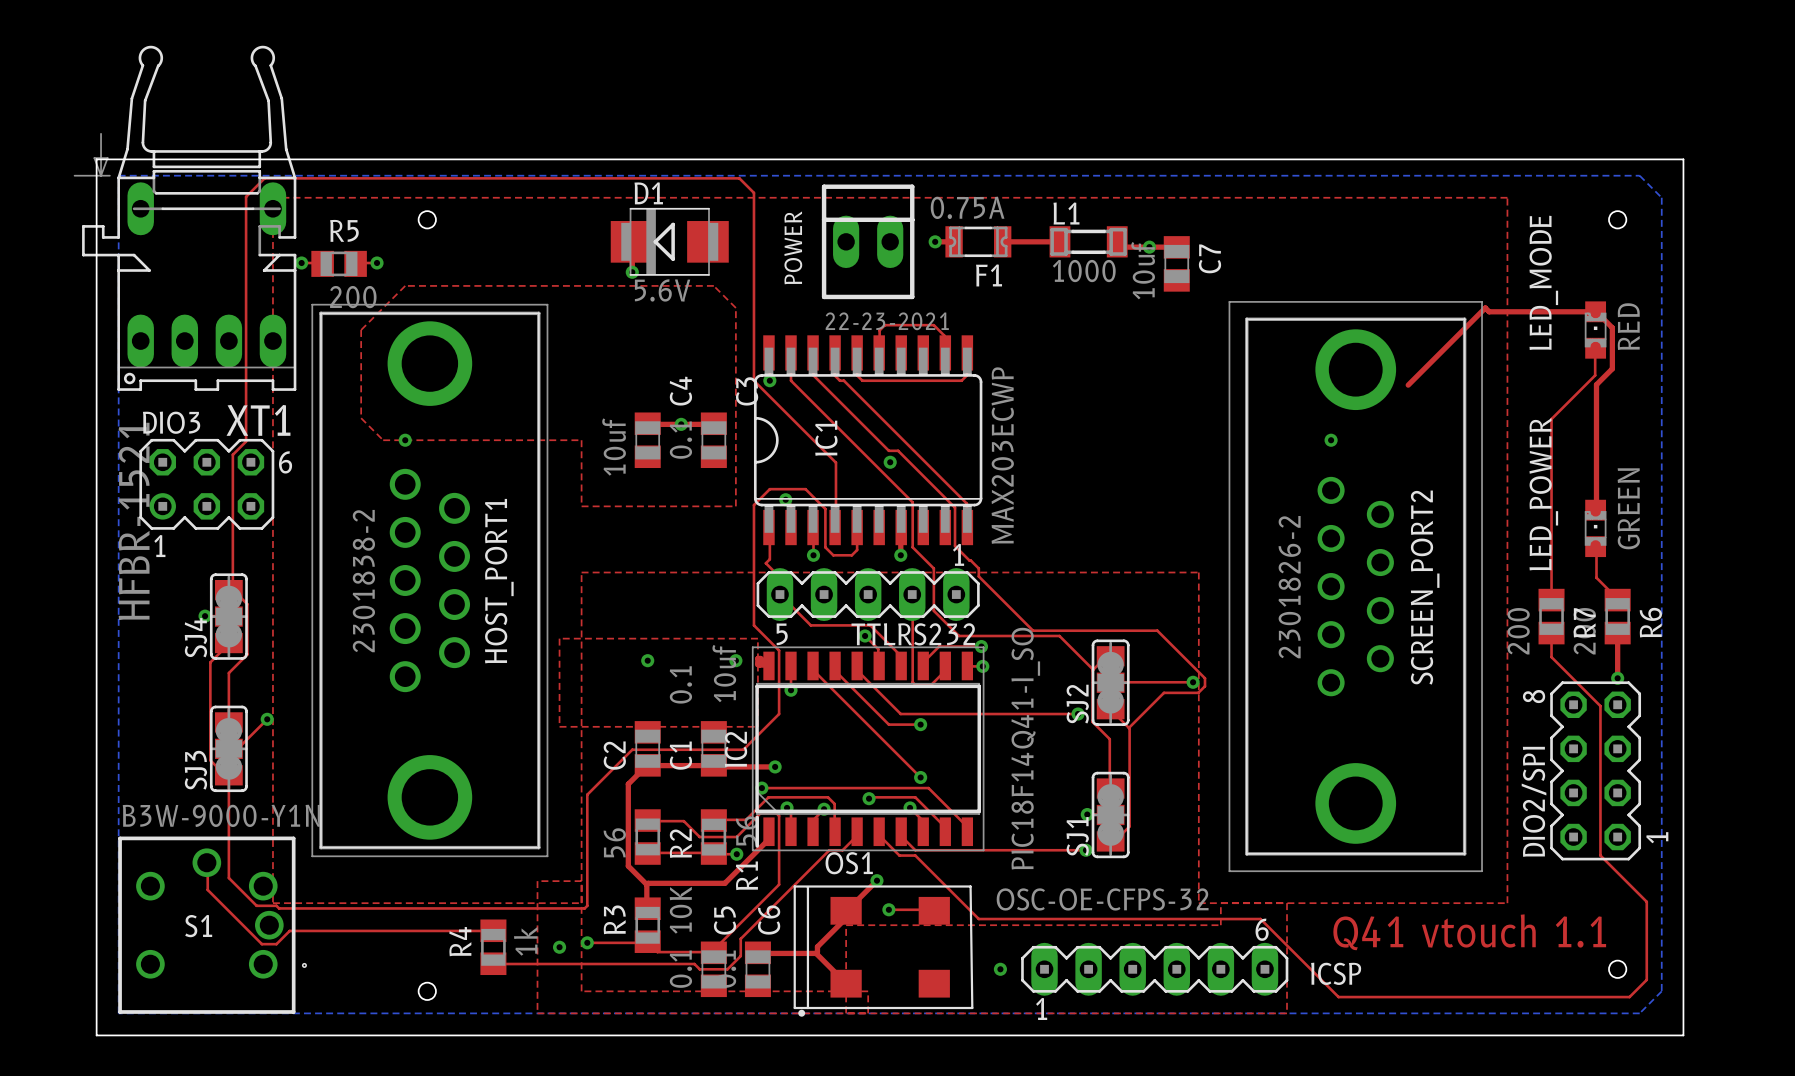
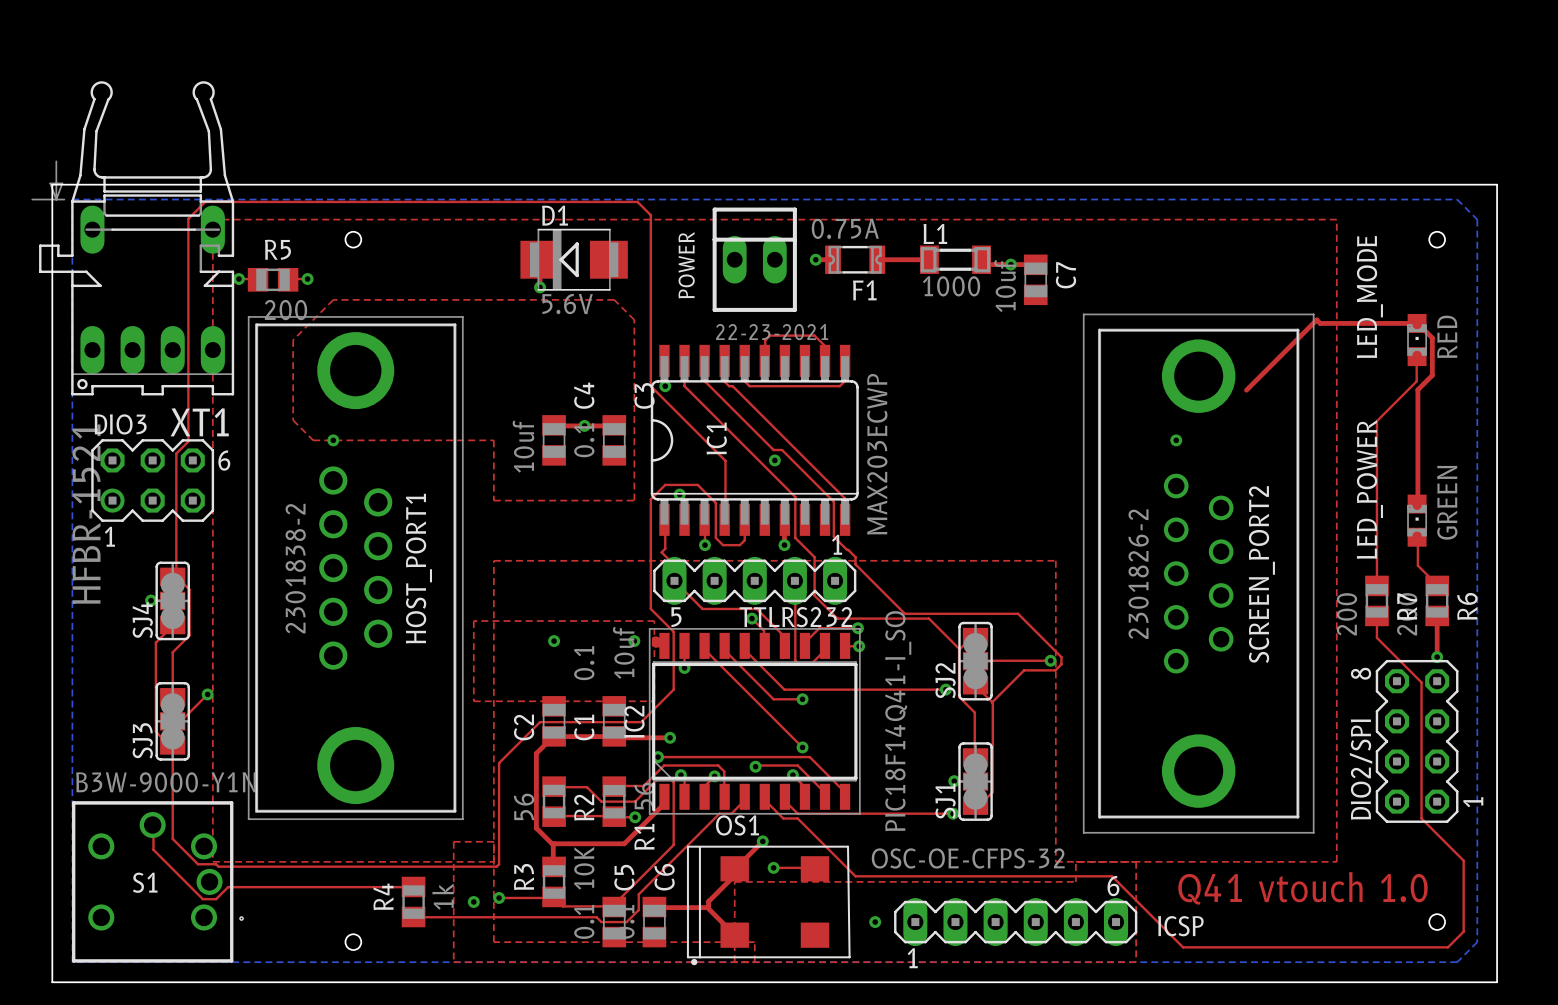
text: Q41 vtouch 1.1 (1469, 932) -> Q41 vtouch 1.0 (1302, 888)

